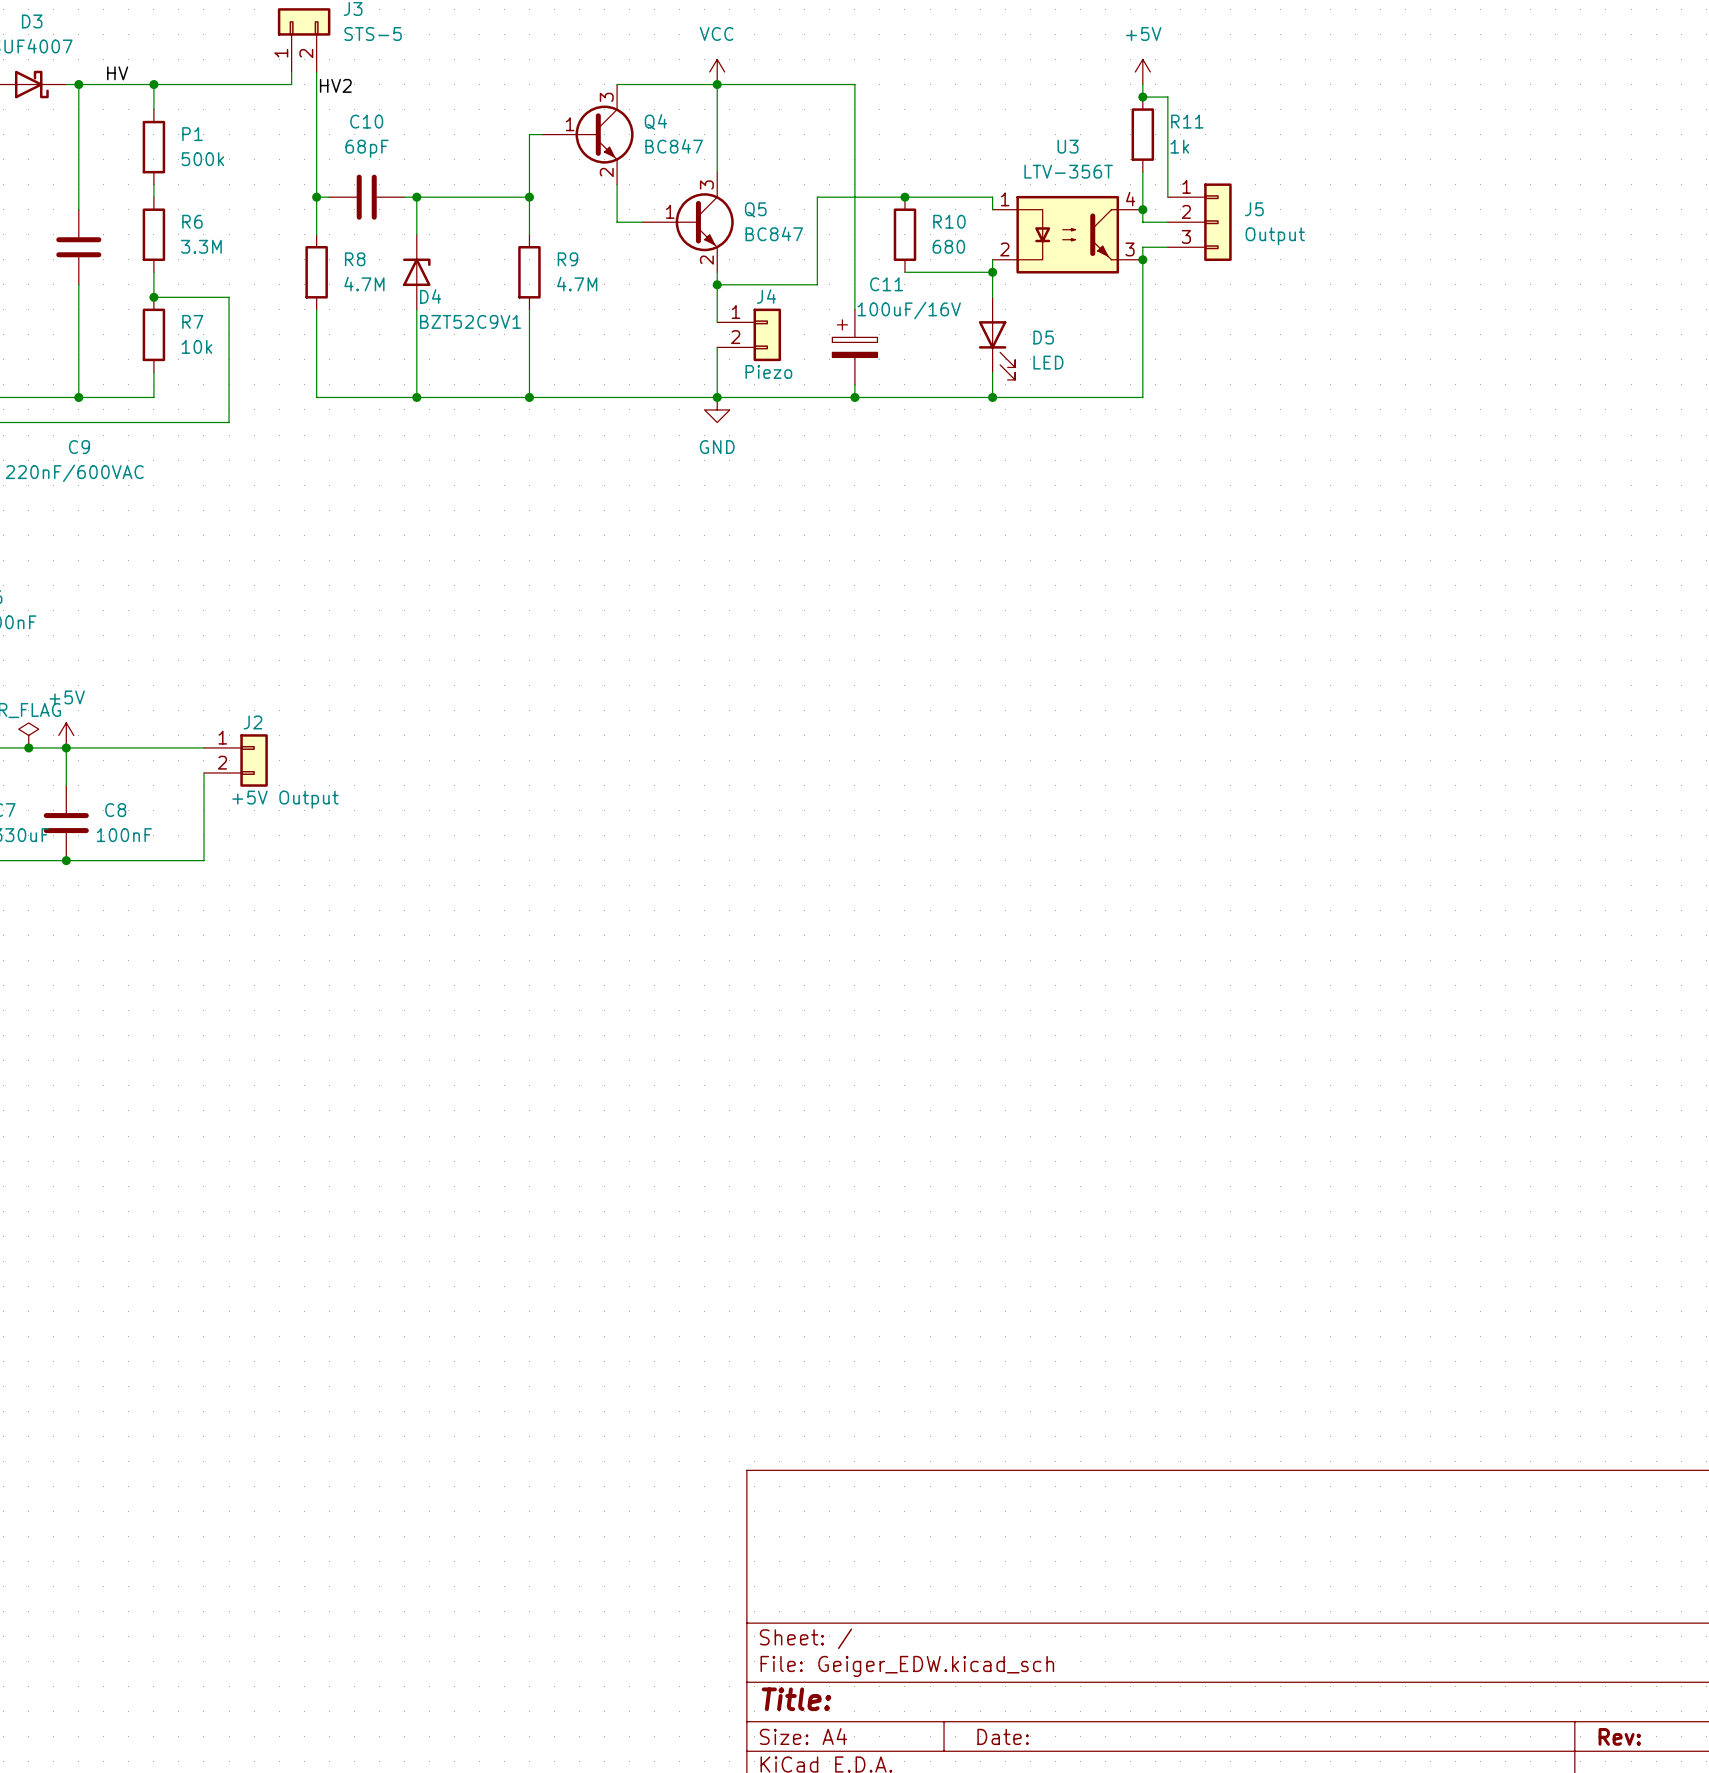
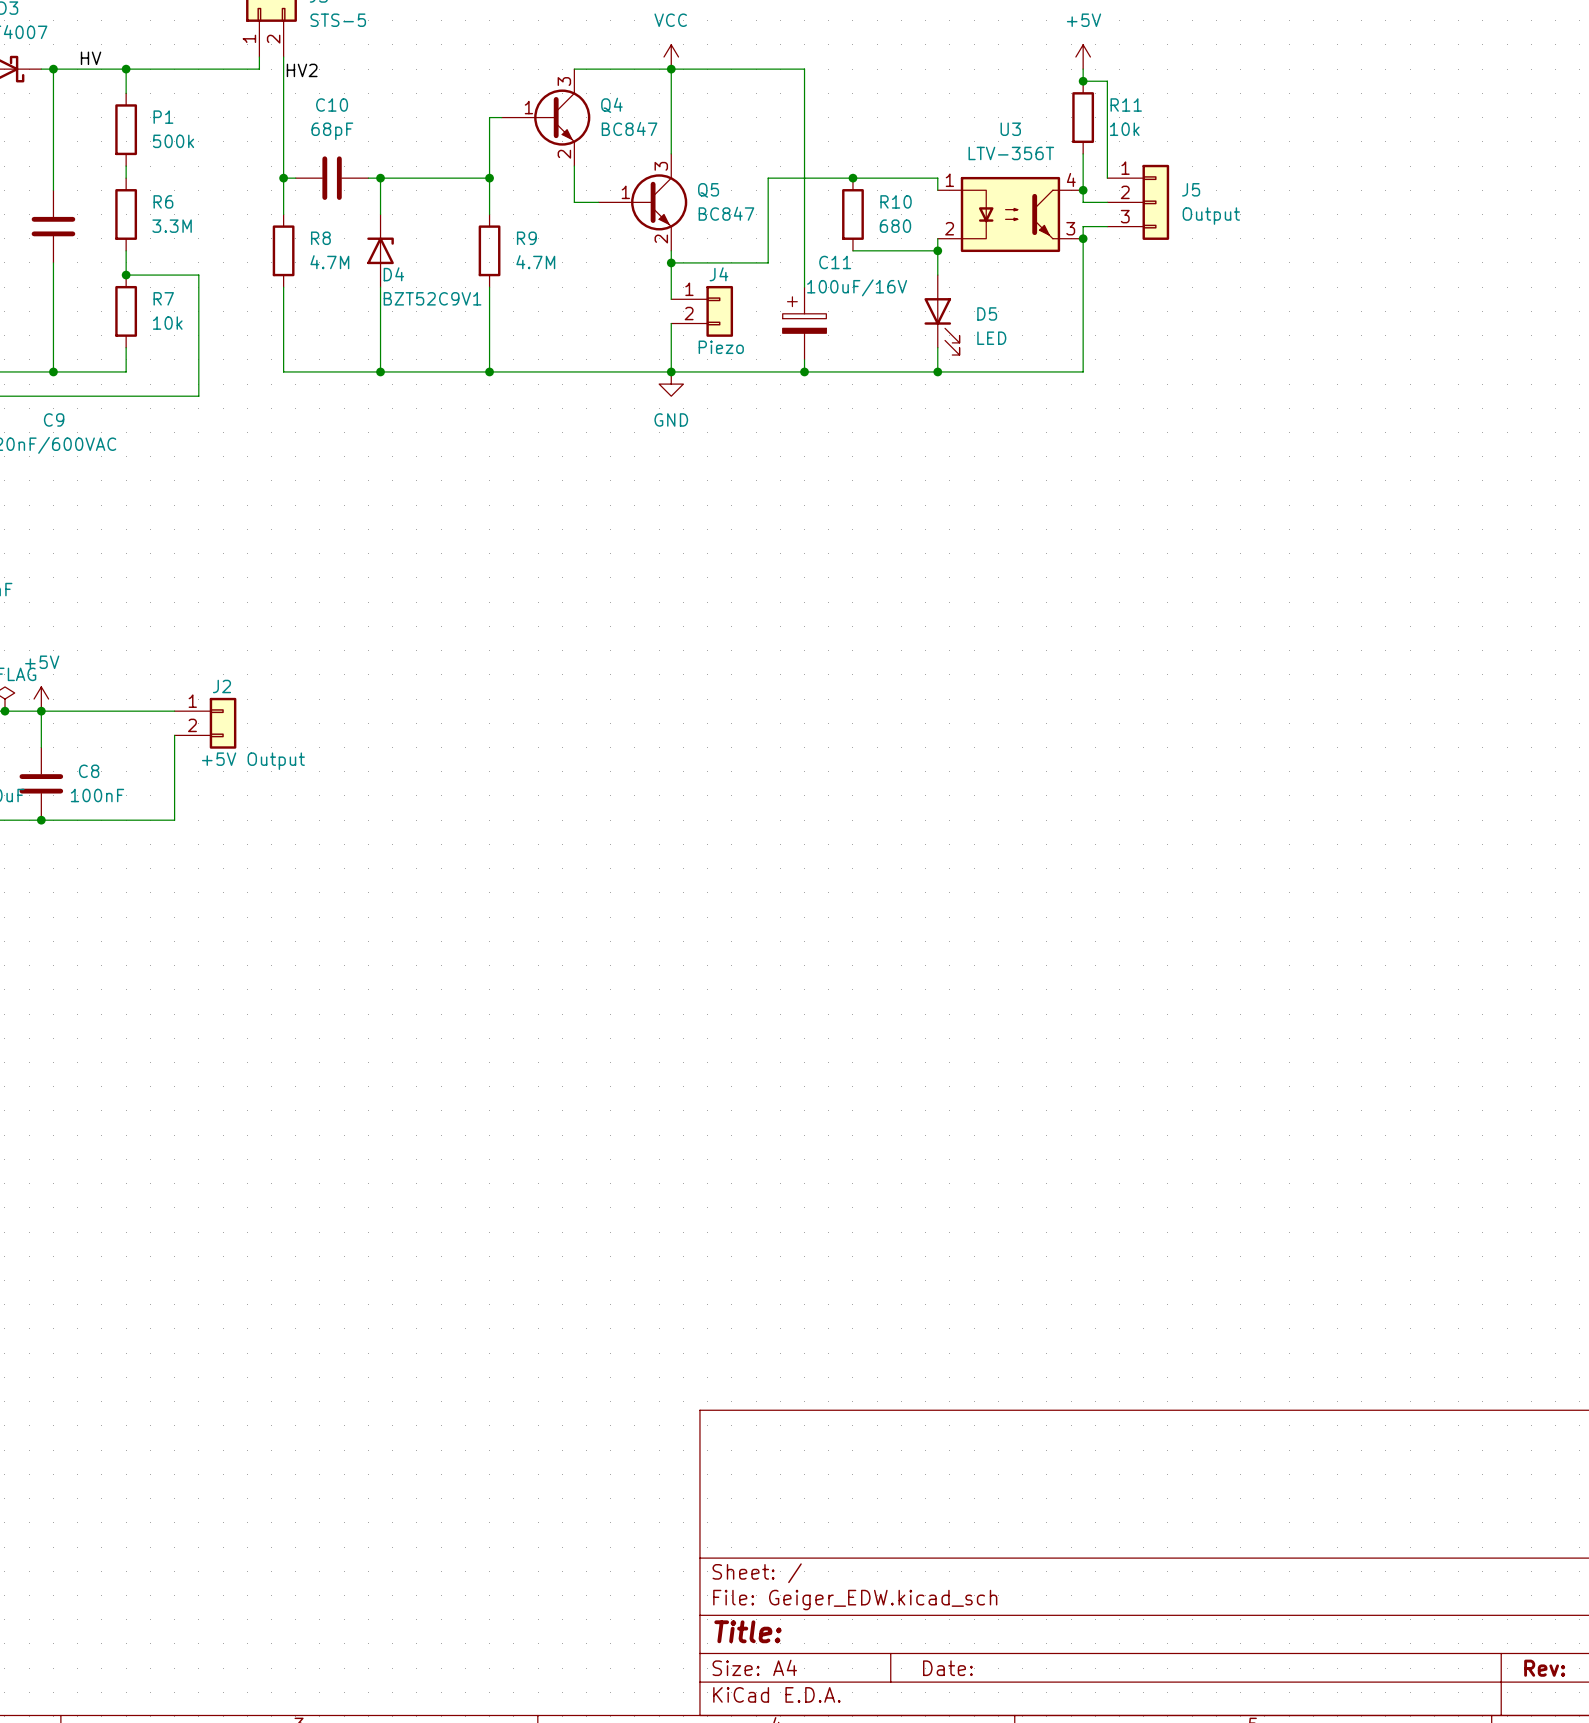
R11 value: 1k (1179, 146) -> 10k (1124, 129)

